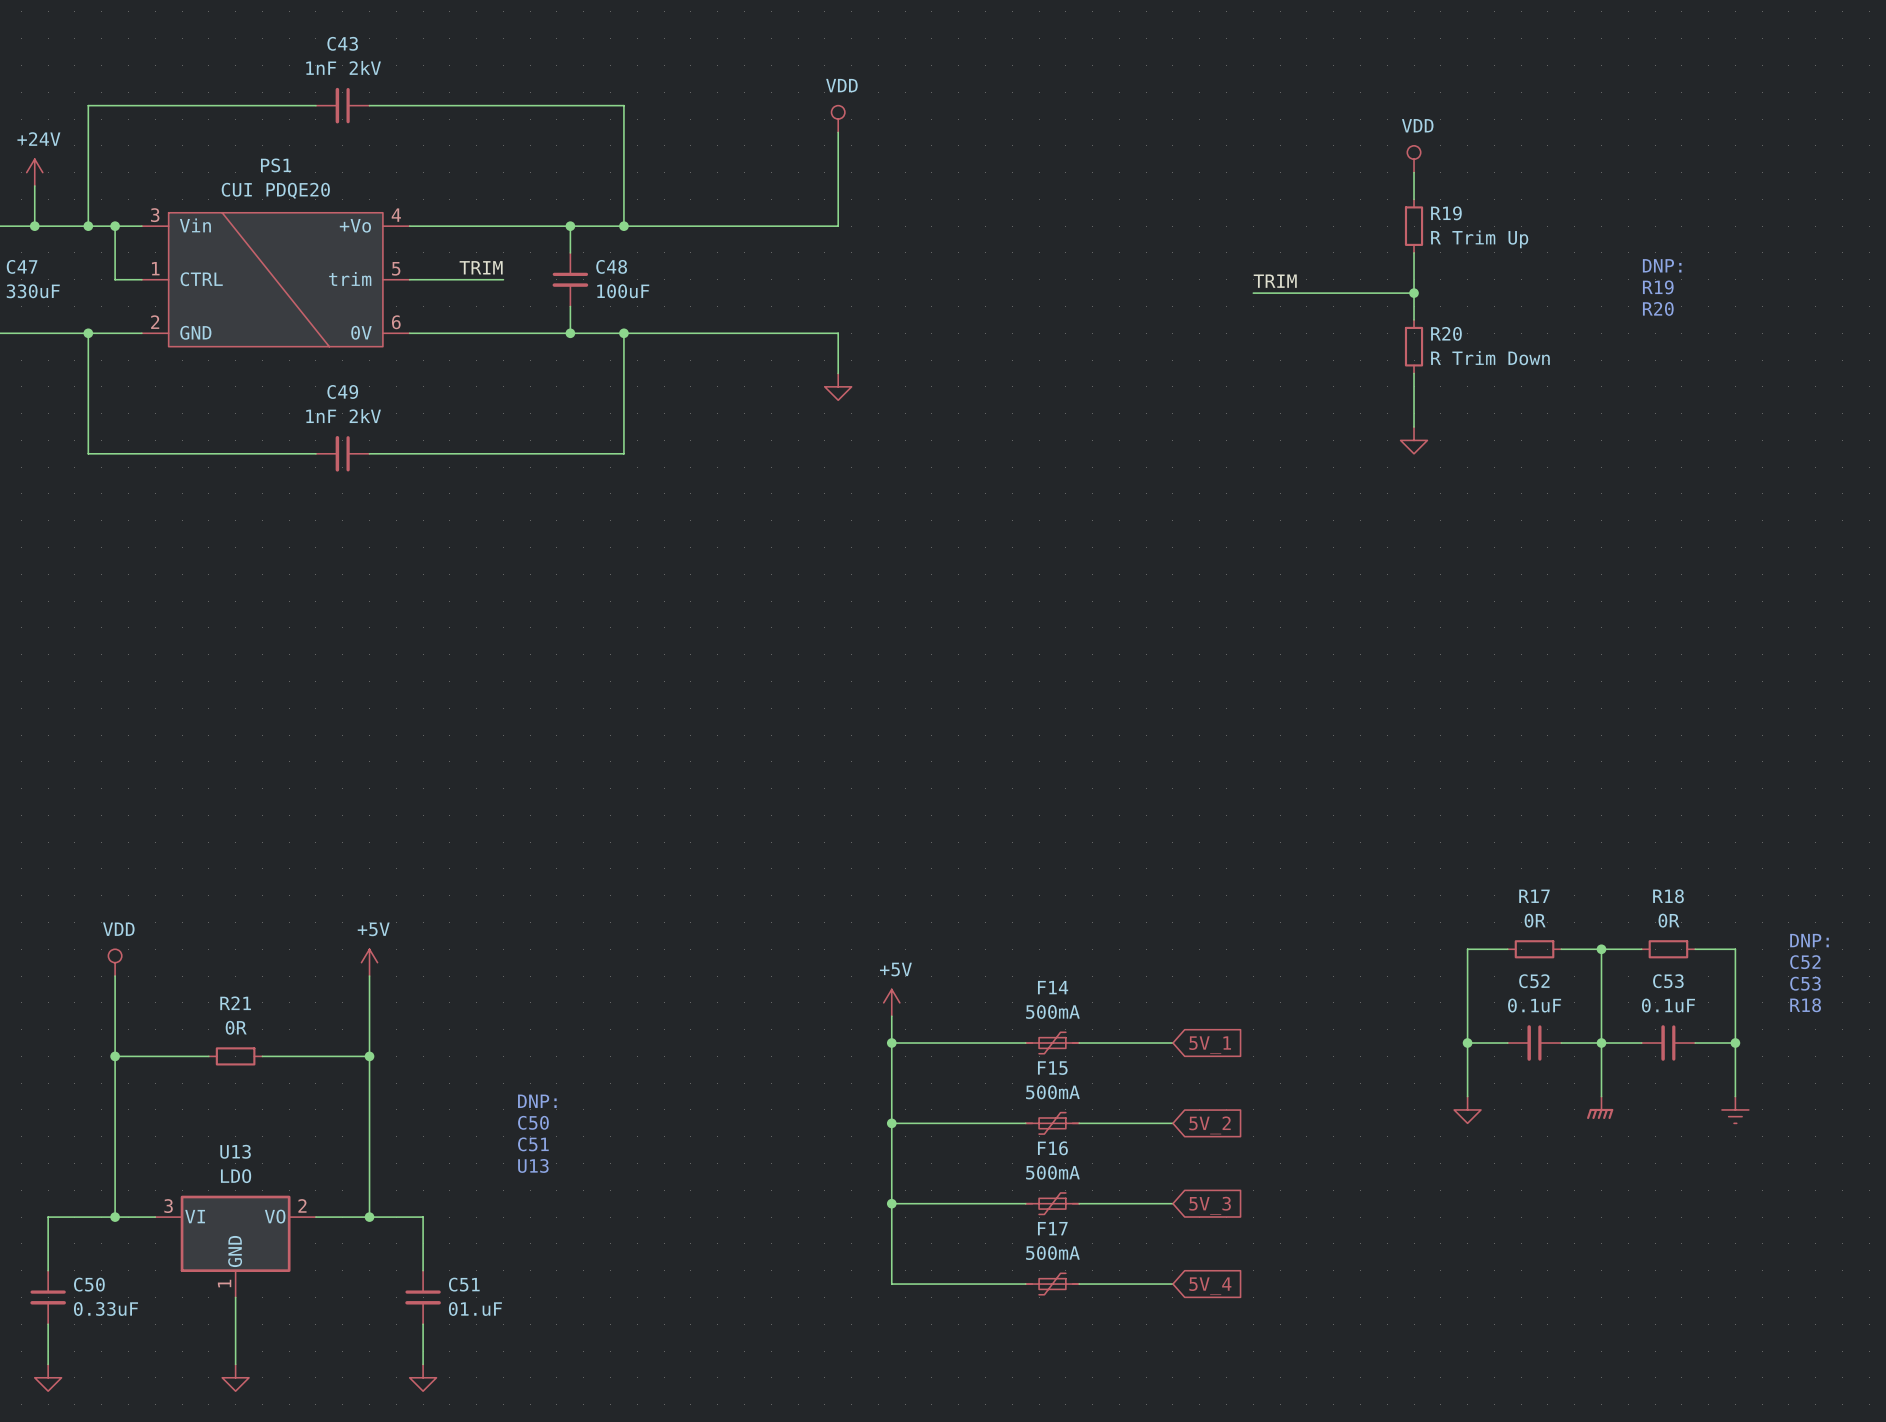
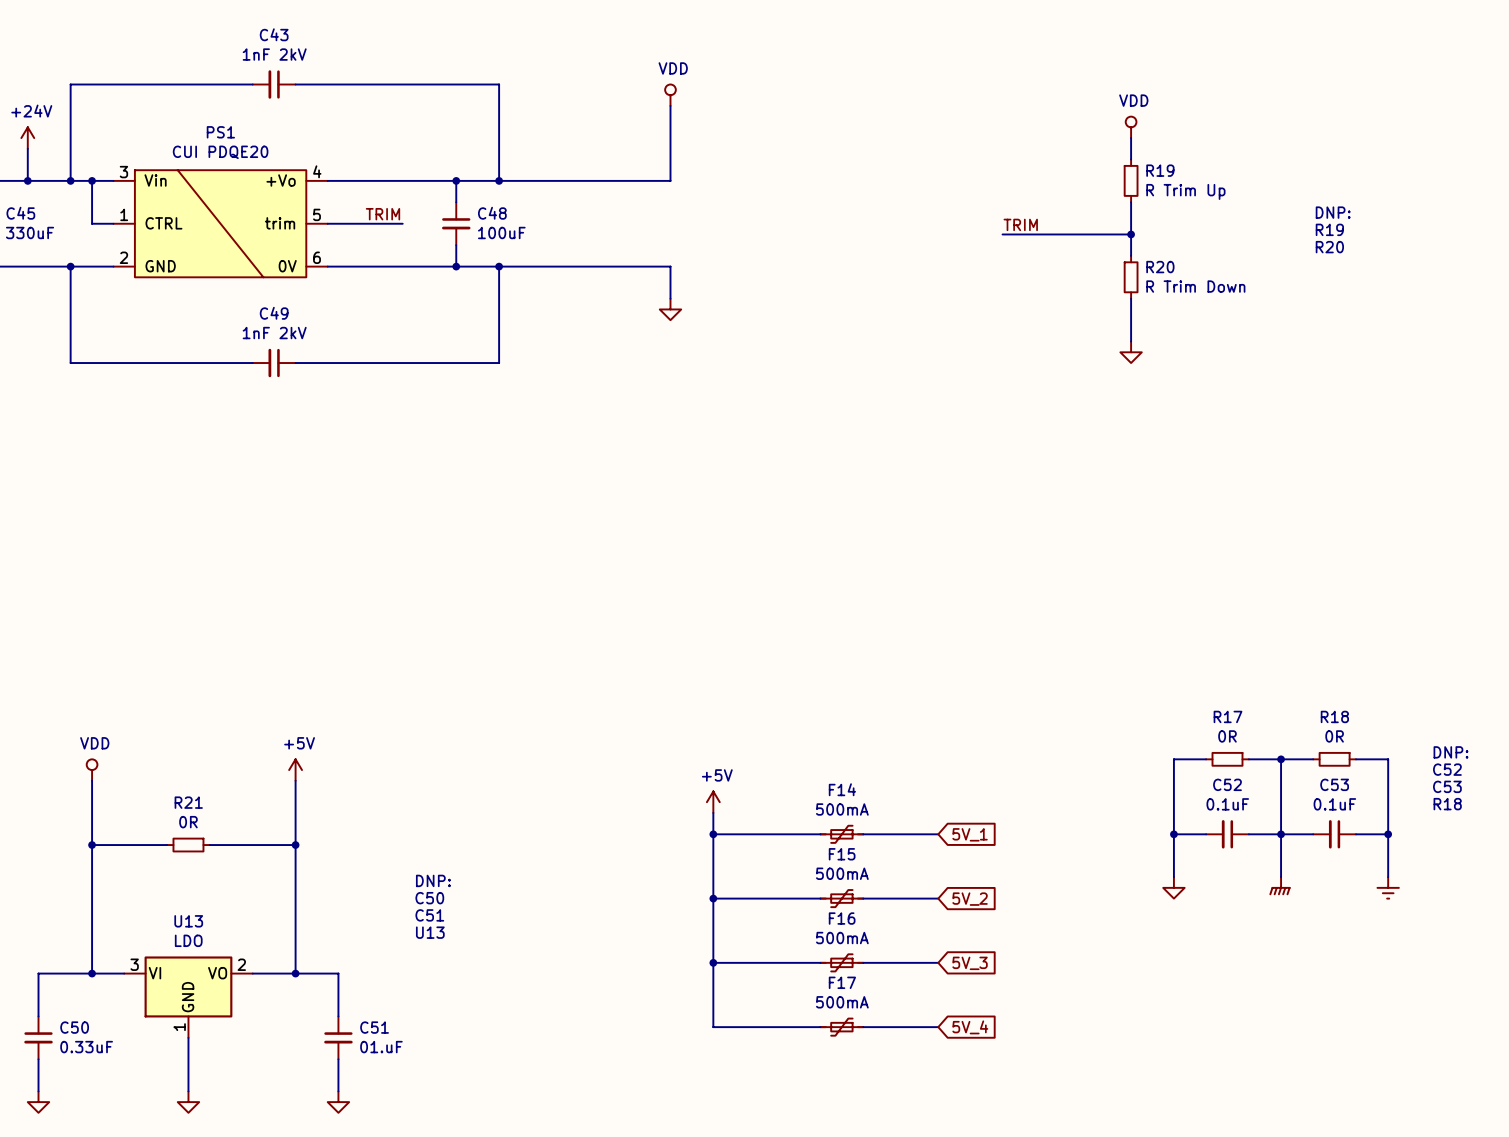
C47 name: C47 (22, 266) -> C45 (20, 213)

